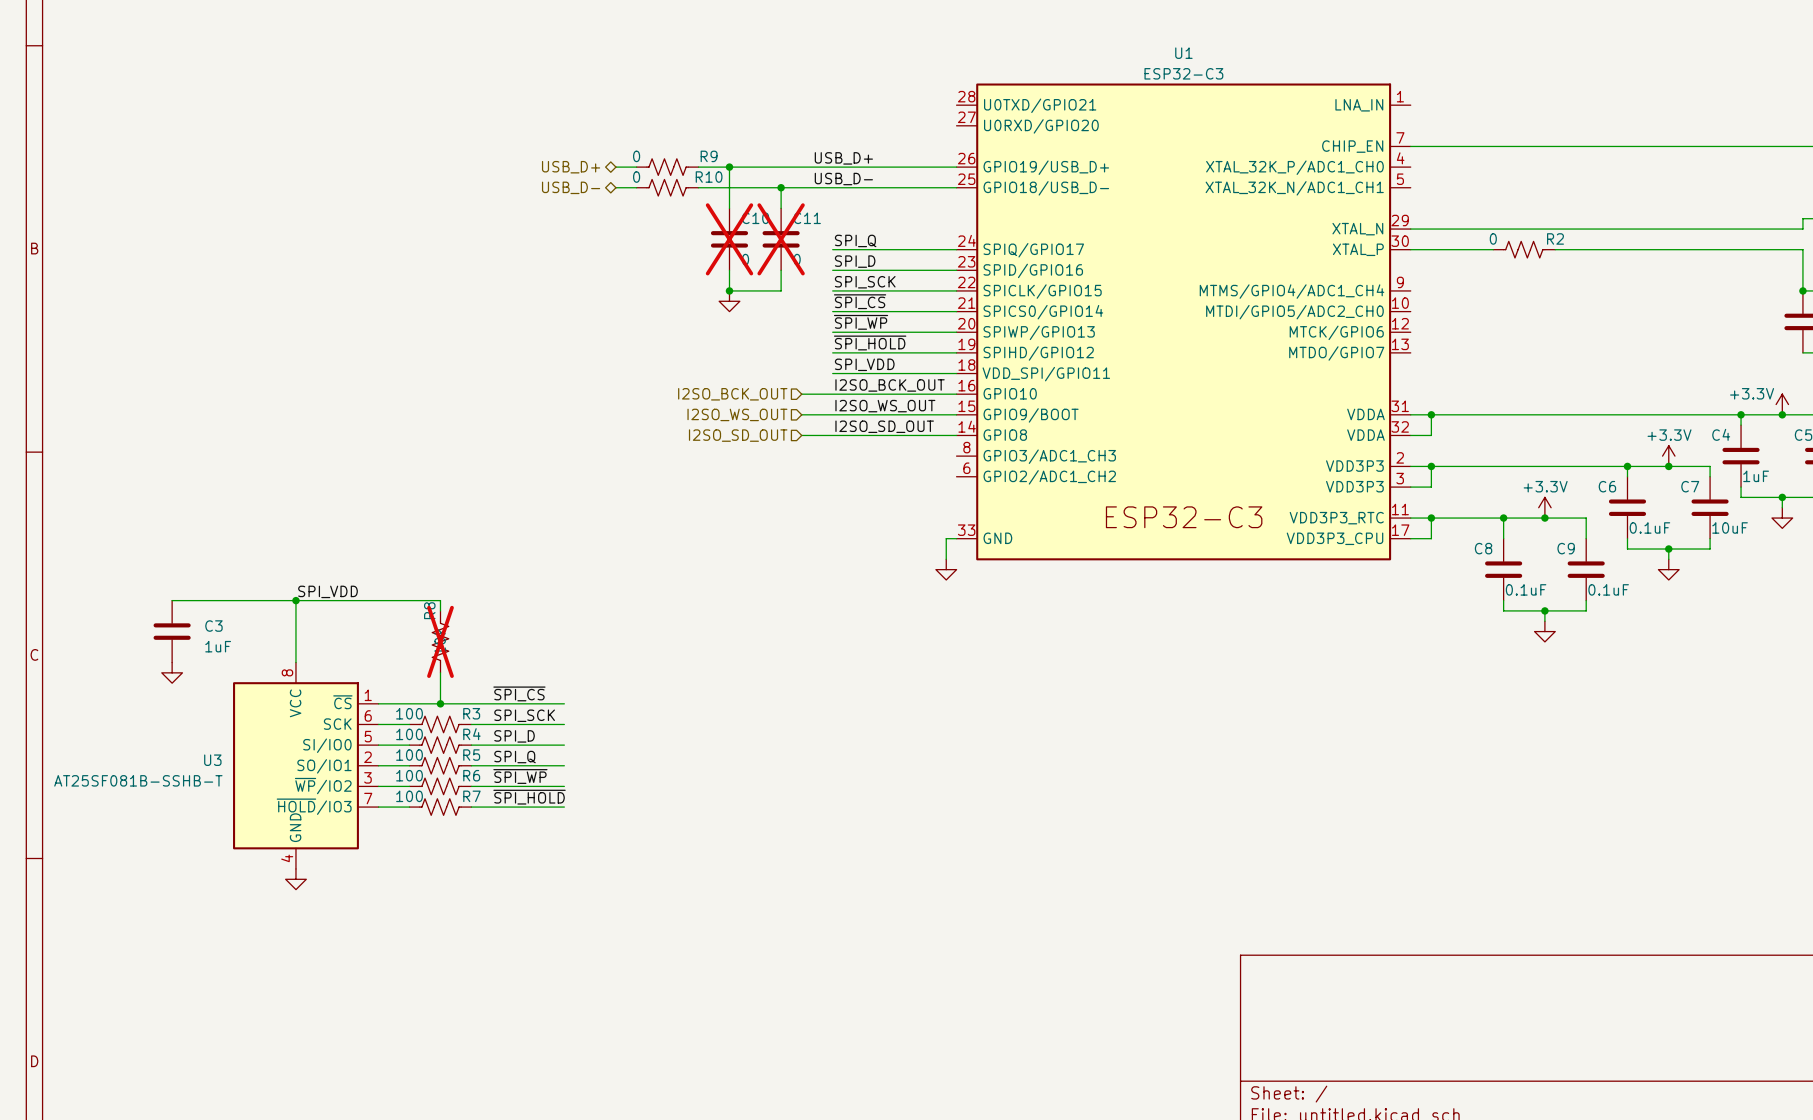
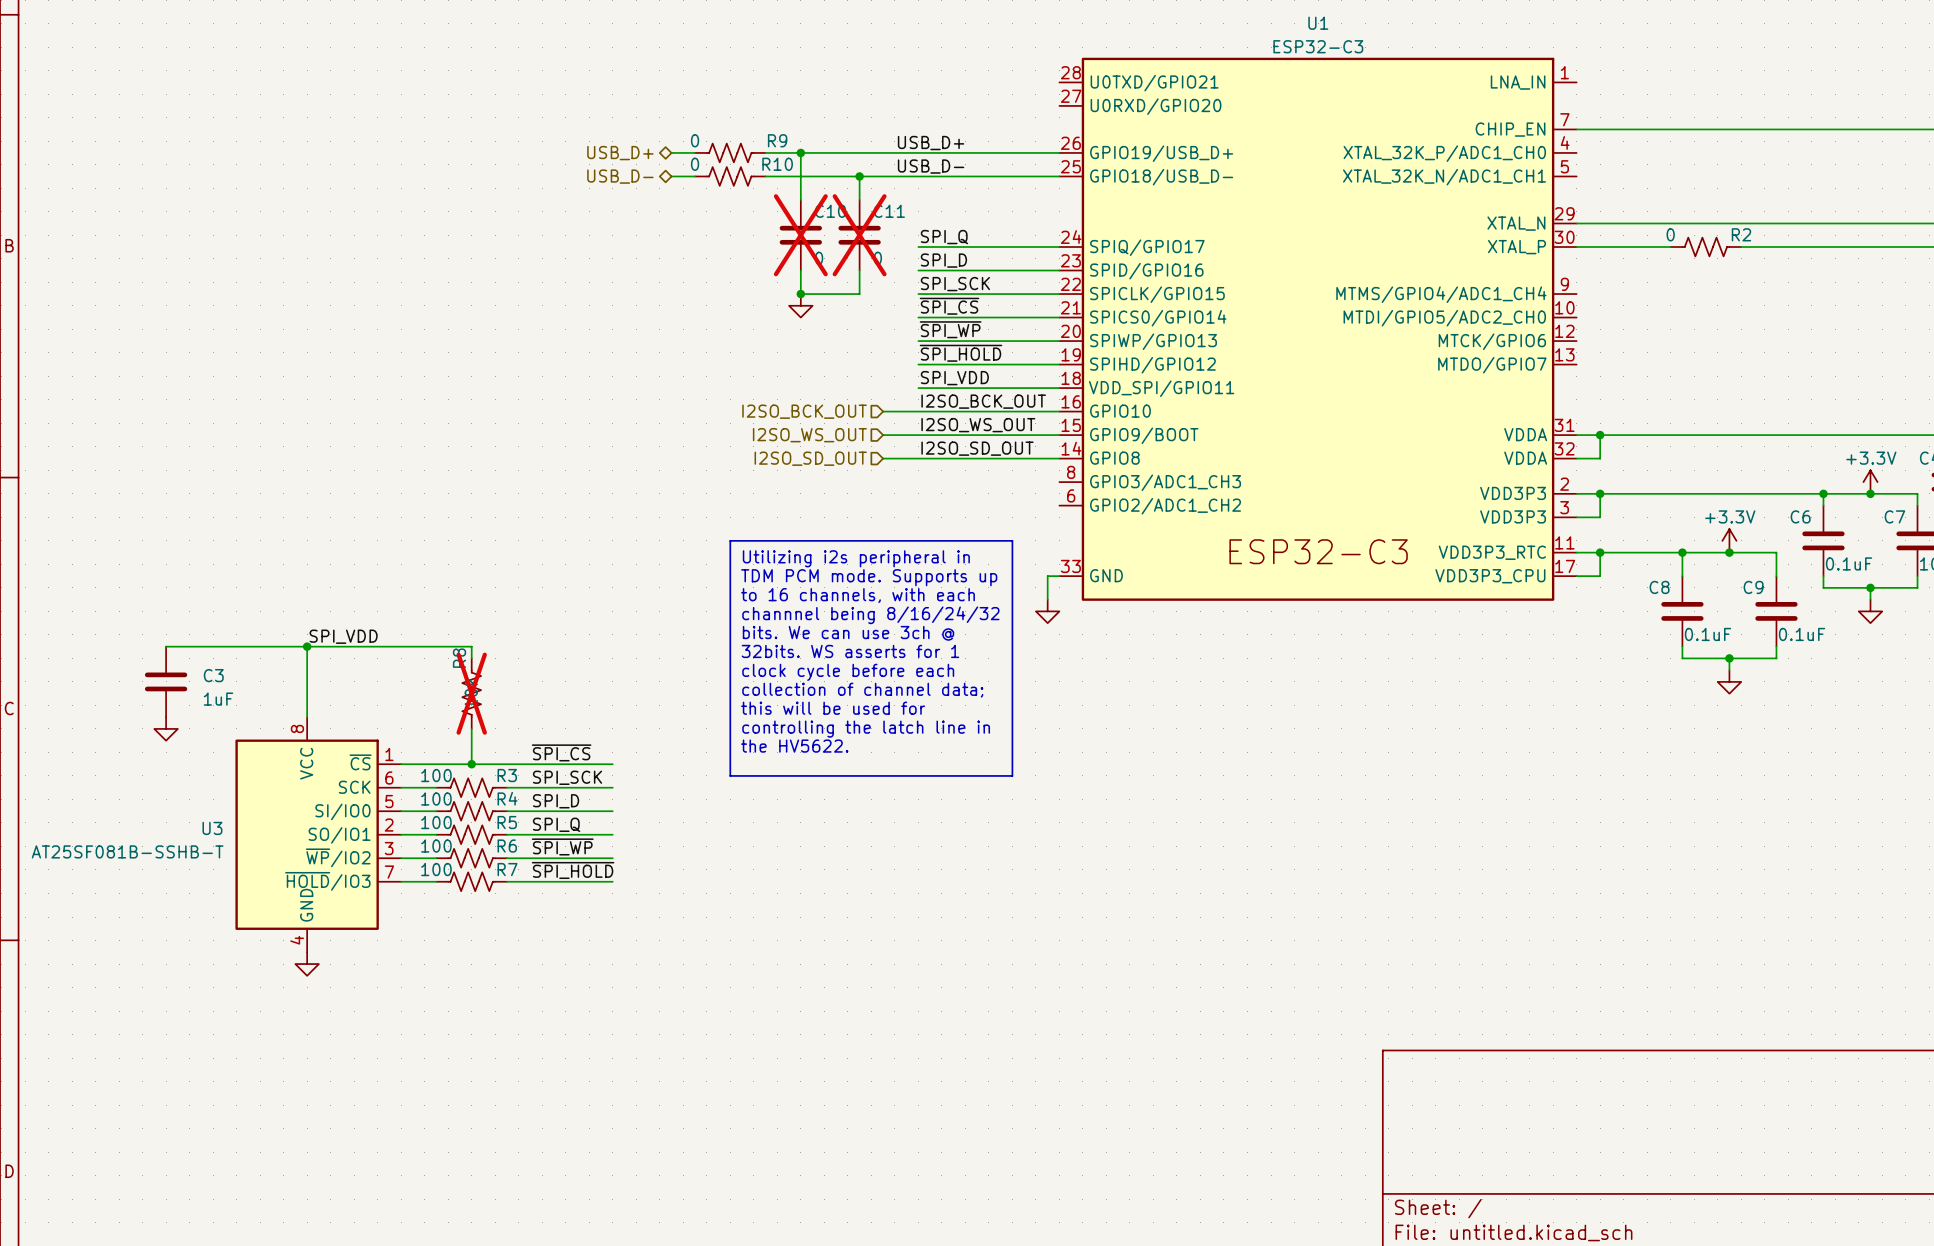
line: none -> (730, 540) (1012, 540) (1012, 775) (730, 775) (730, 540)
text: none -> Utilizing i2s peripheral in (856, 558)
text: none -> TDM PCM mode. Supports up (869, 577)
text: none -> to 16 channels, with each (858, 595)
text: none -> channnel being 8/16/24/32 (870, 615)
text: none -> bits. We can use 3ch @ (848, 633)
text: none -> 32bits. WS asserts for 1 (850, 651)
text: none -> clock cycle before each (848, 672)
text: none -> collection of channel data; (862, 690)
text: none -> this will be used for (833, 708)
text: none -> controlling the latch line in (866, 729)
text: none -> the HV5622. (794, 746)

